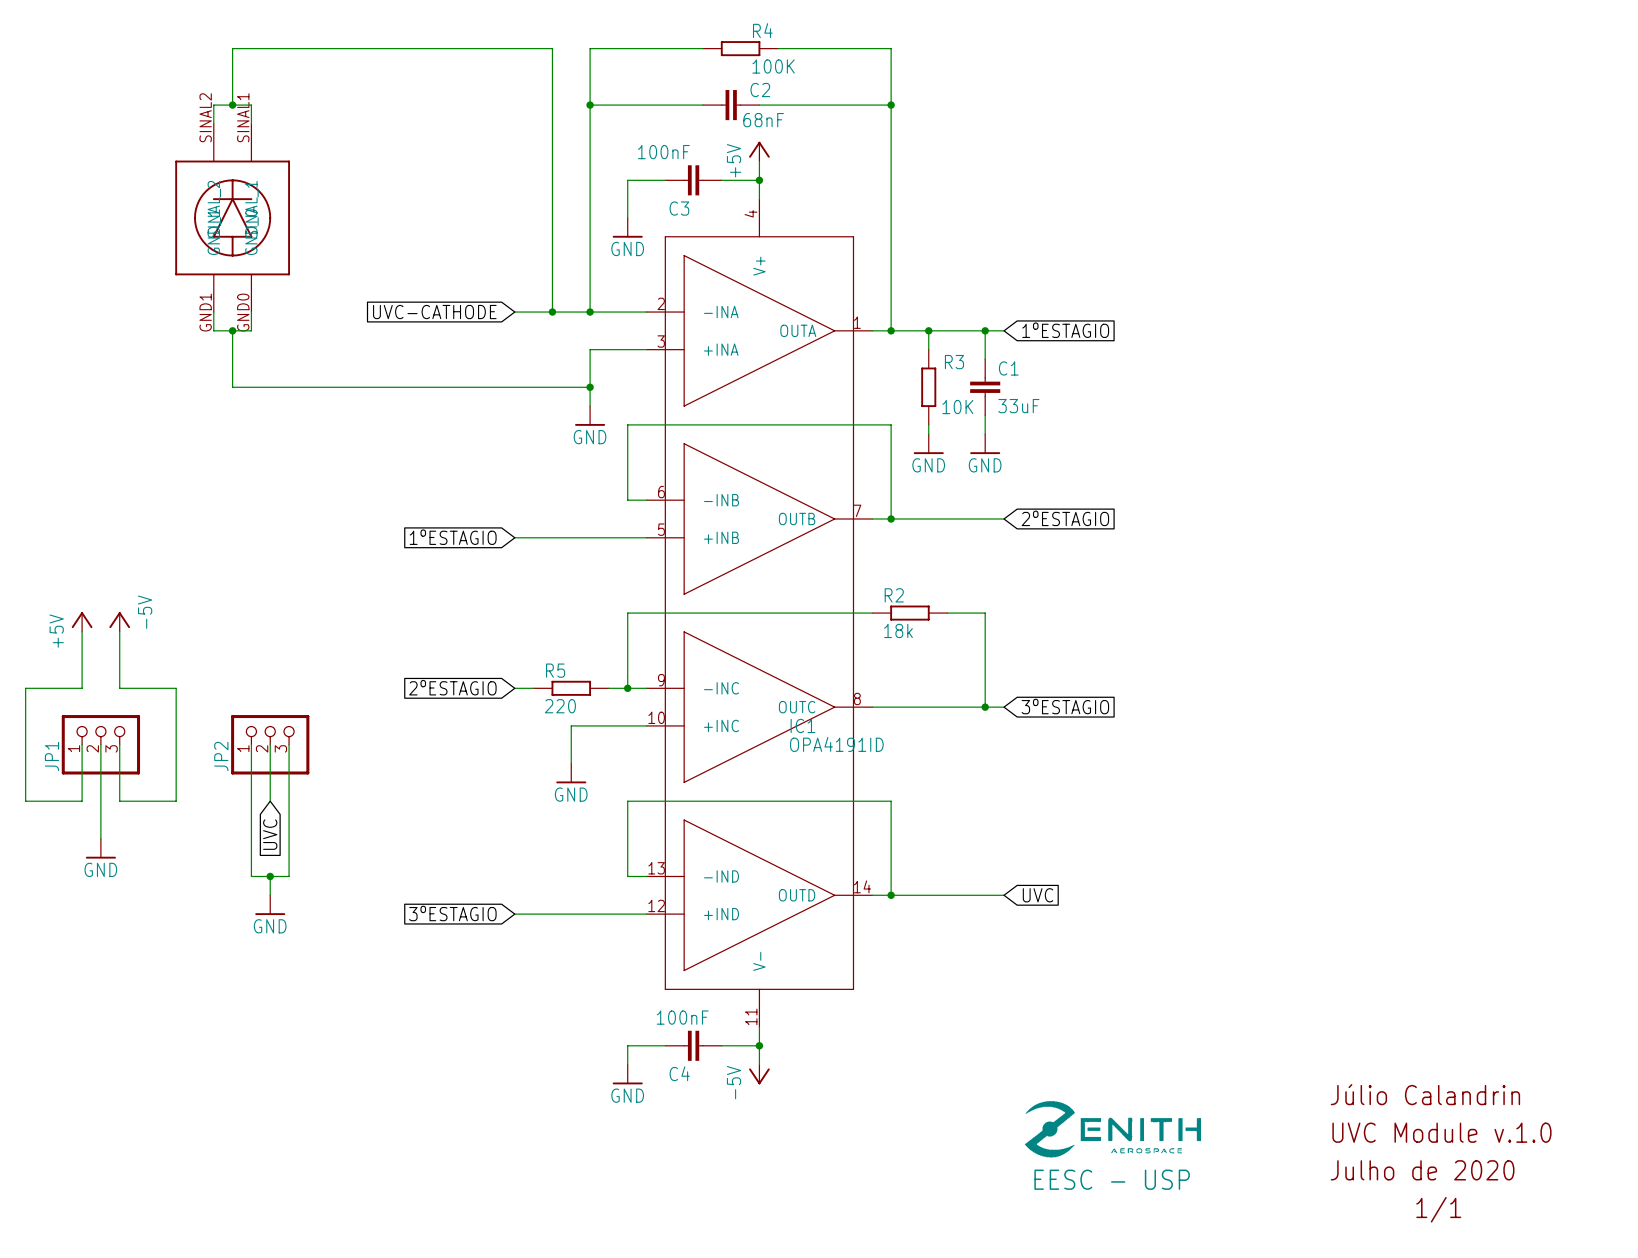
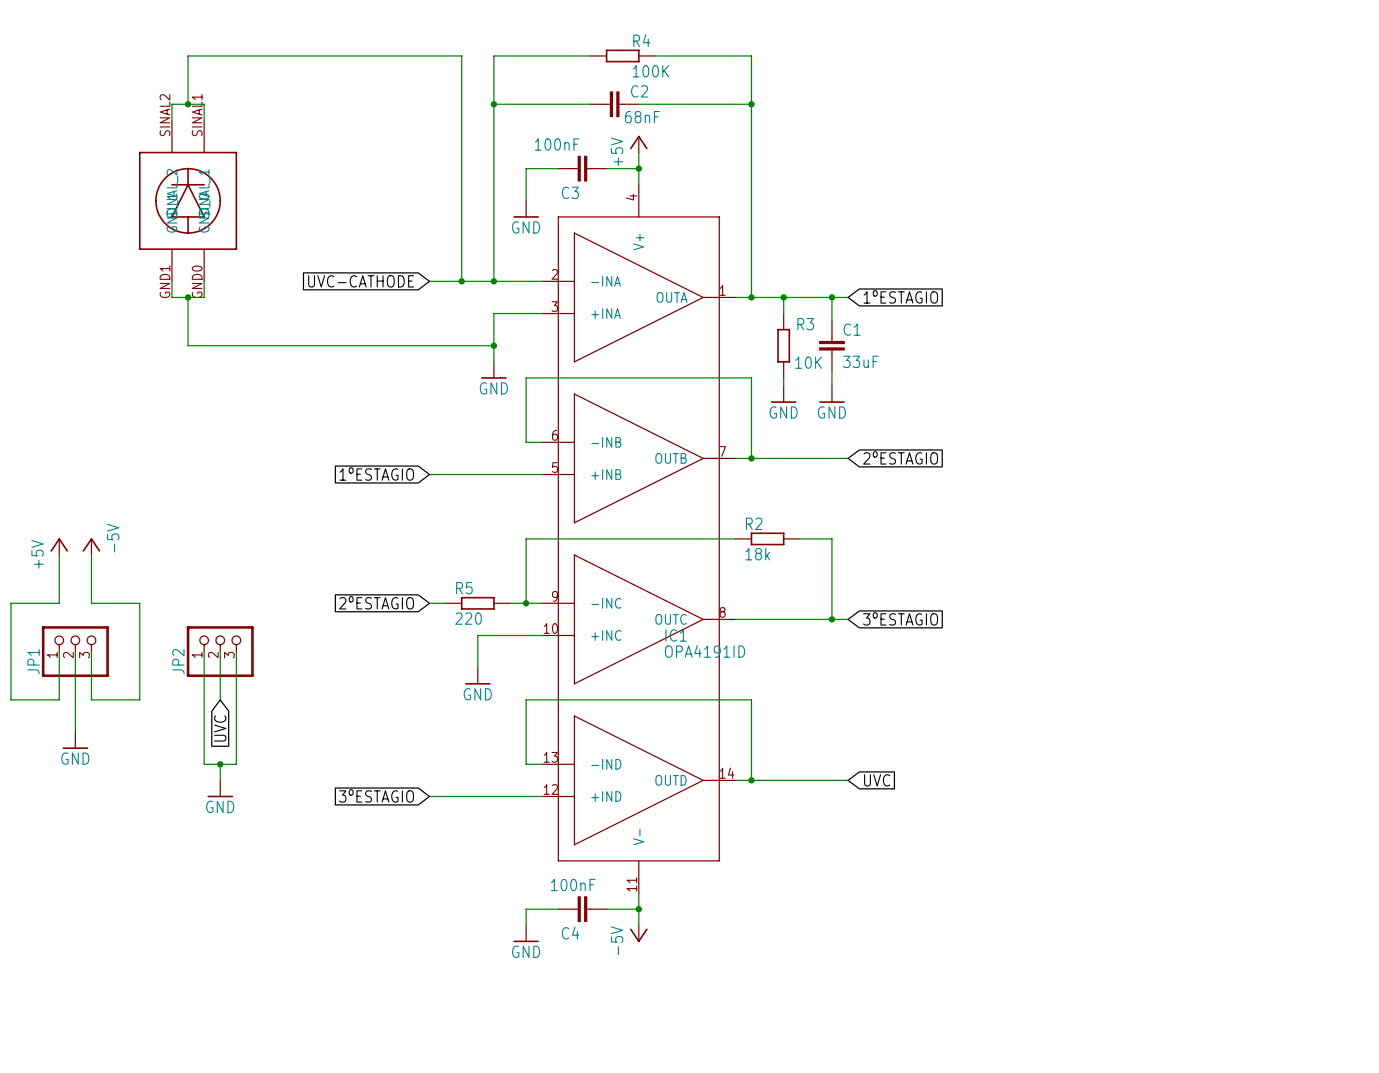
text: Júlio Calandrin (1425, 1094) -> none
drawing: [1024, 1101, 1201, 1158] -> none
text: UVC Module v.1.0 (1441, 1132) -> none
text: Julho de 2020 (1422, 1170) -> none
text: EESC - USP (1112, 1179) -> none
text: 1/1 (1438, 1209) -> none

